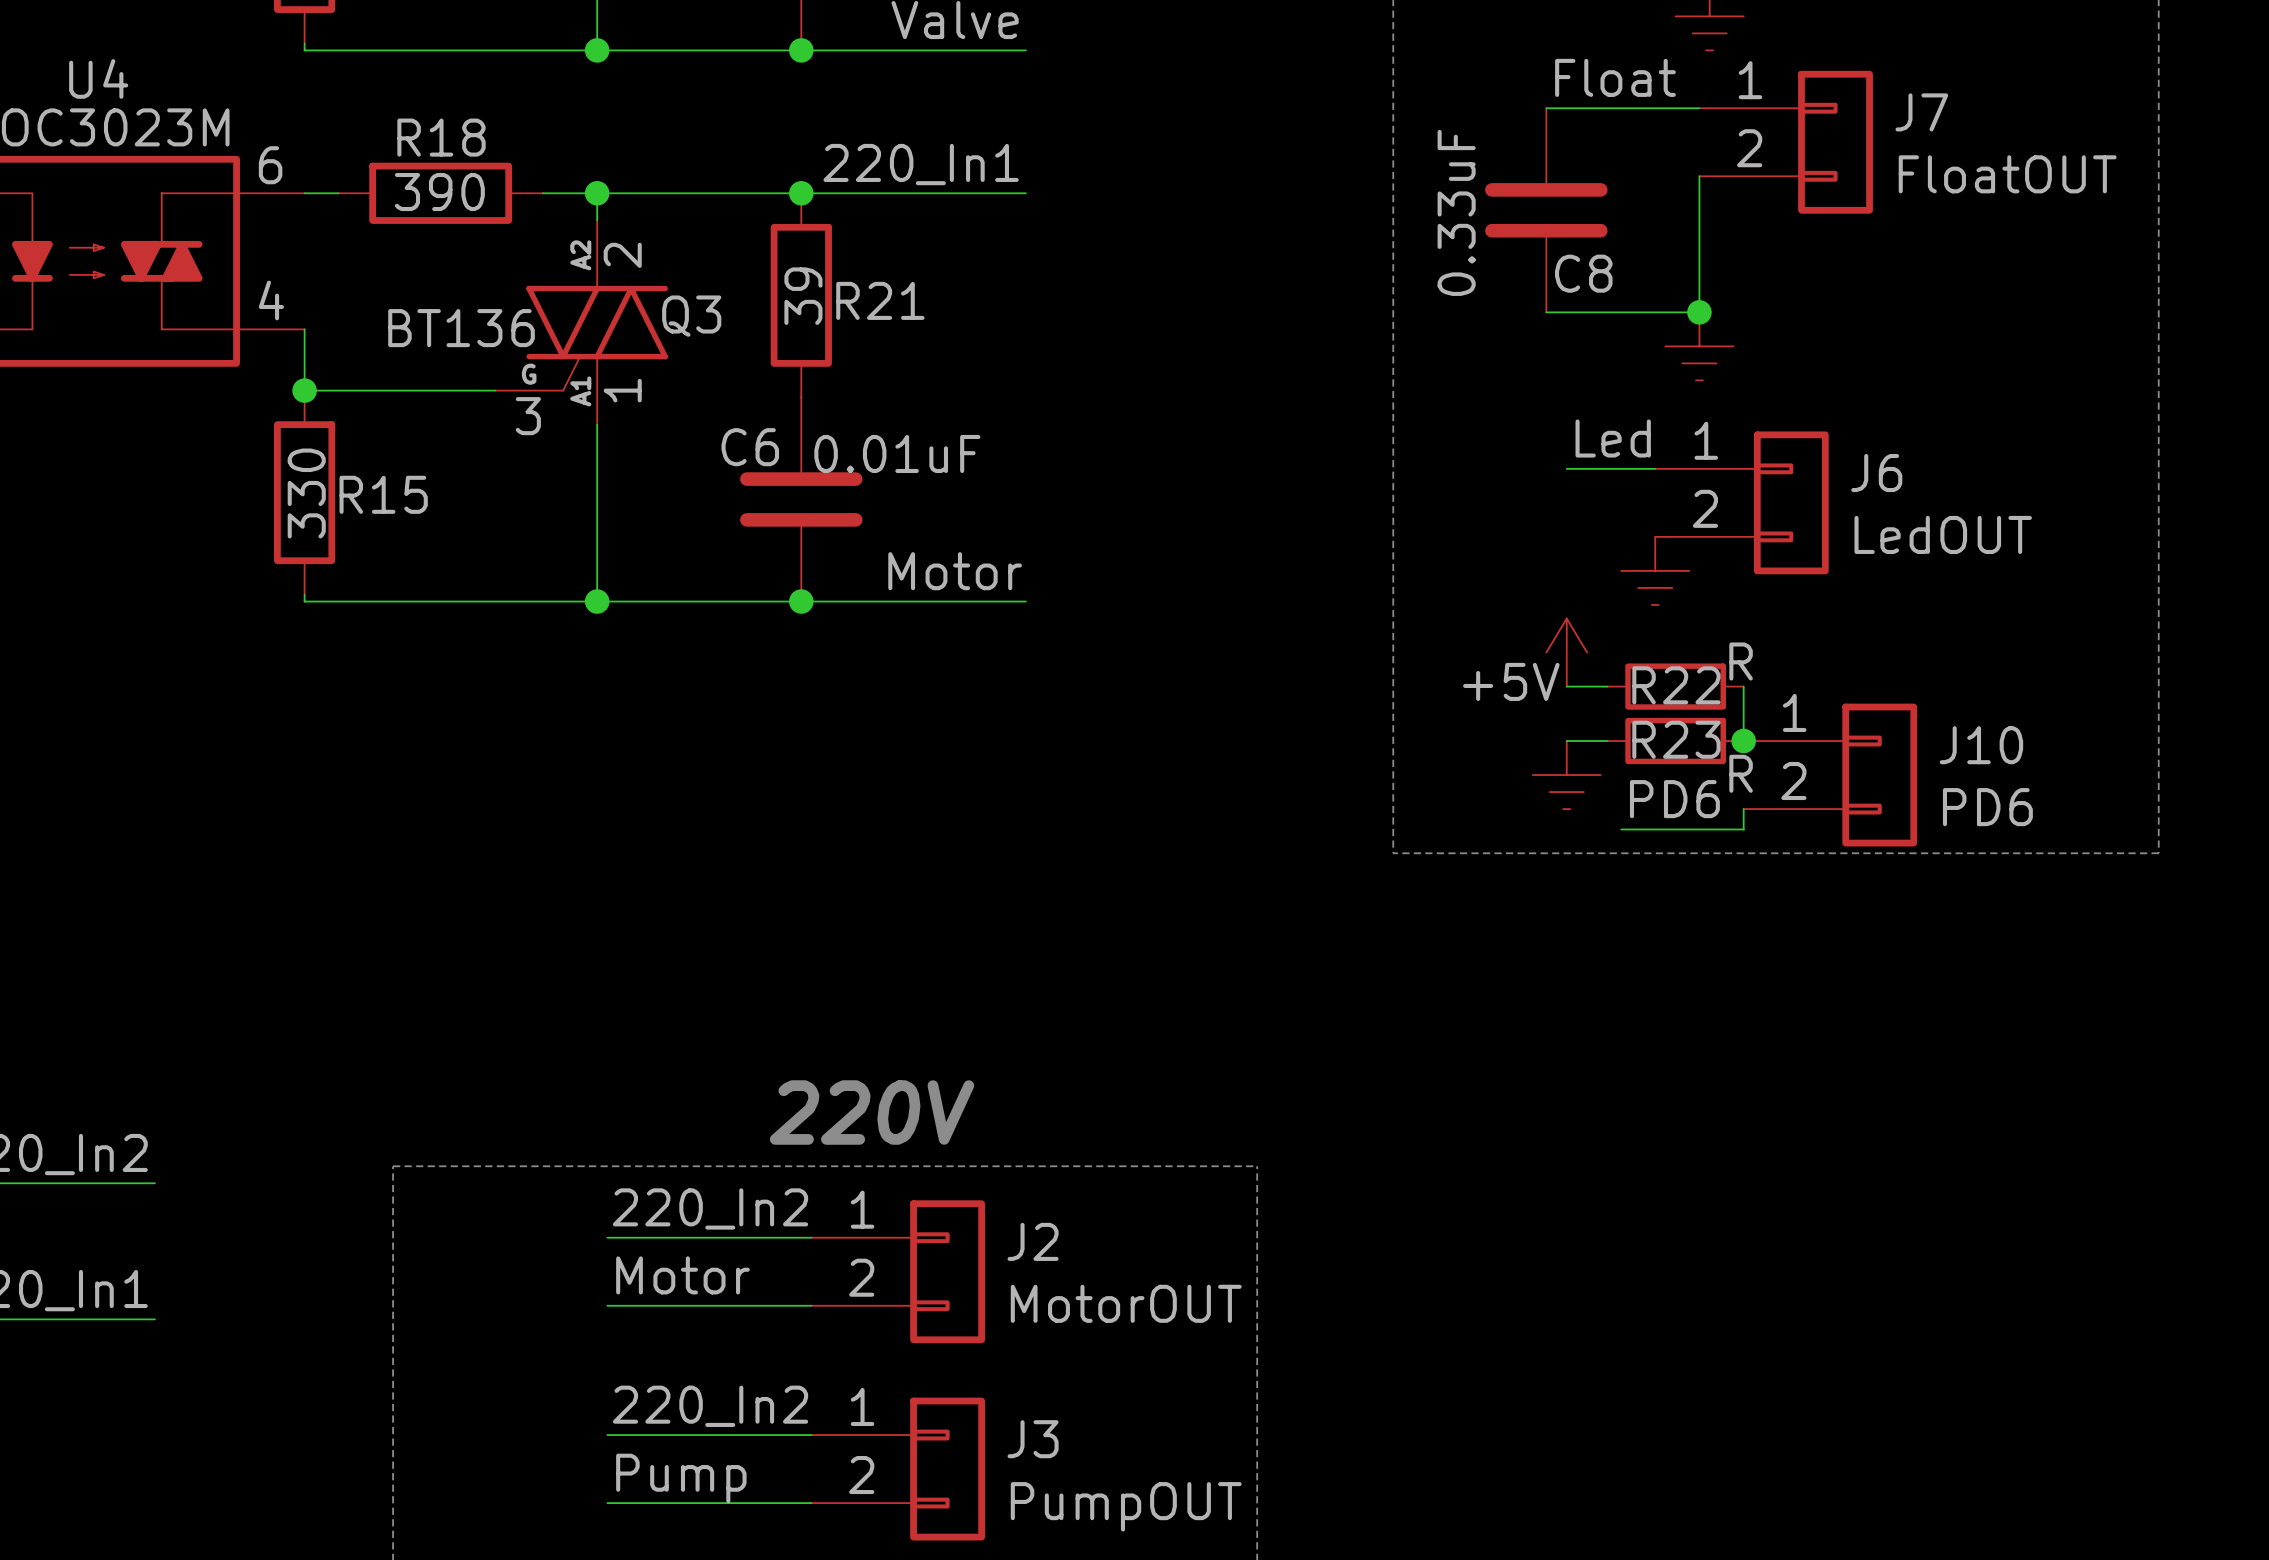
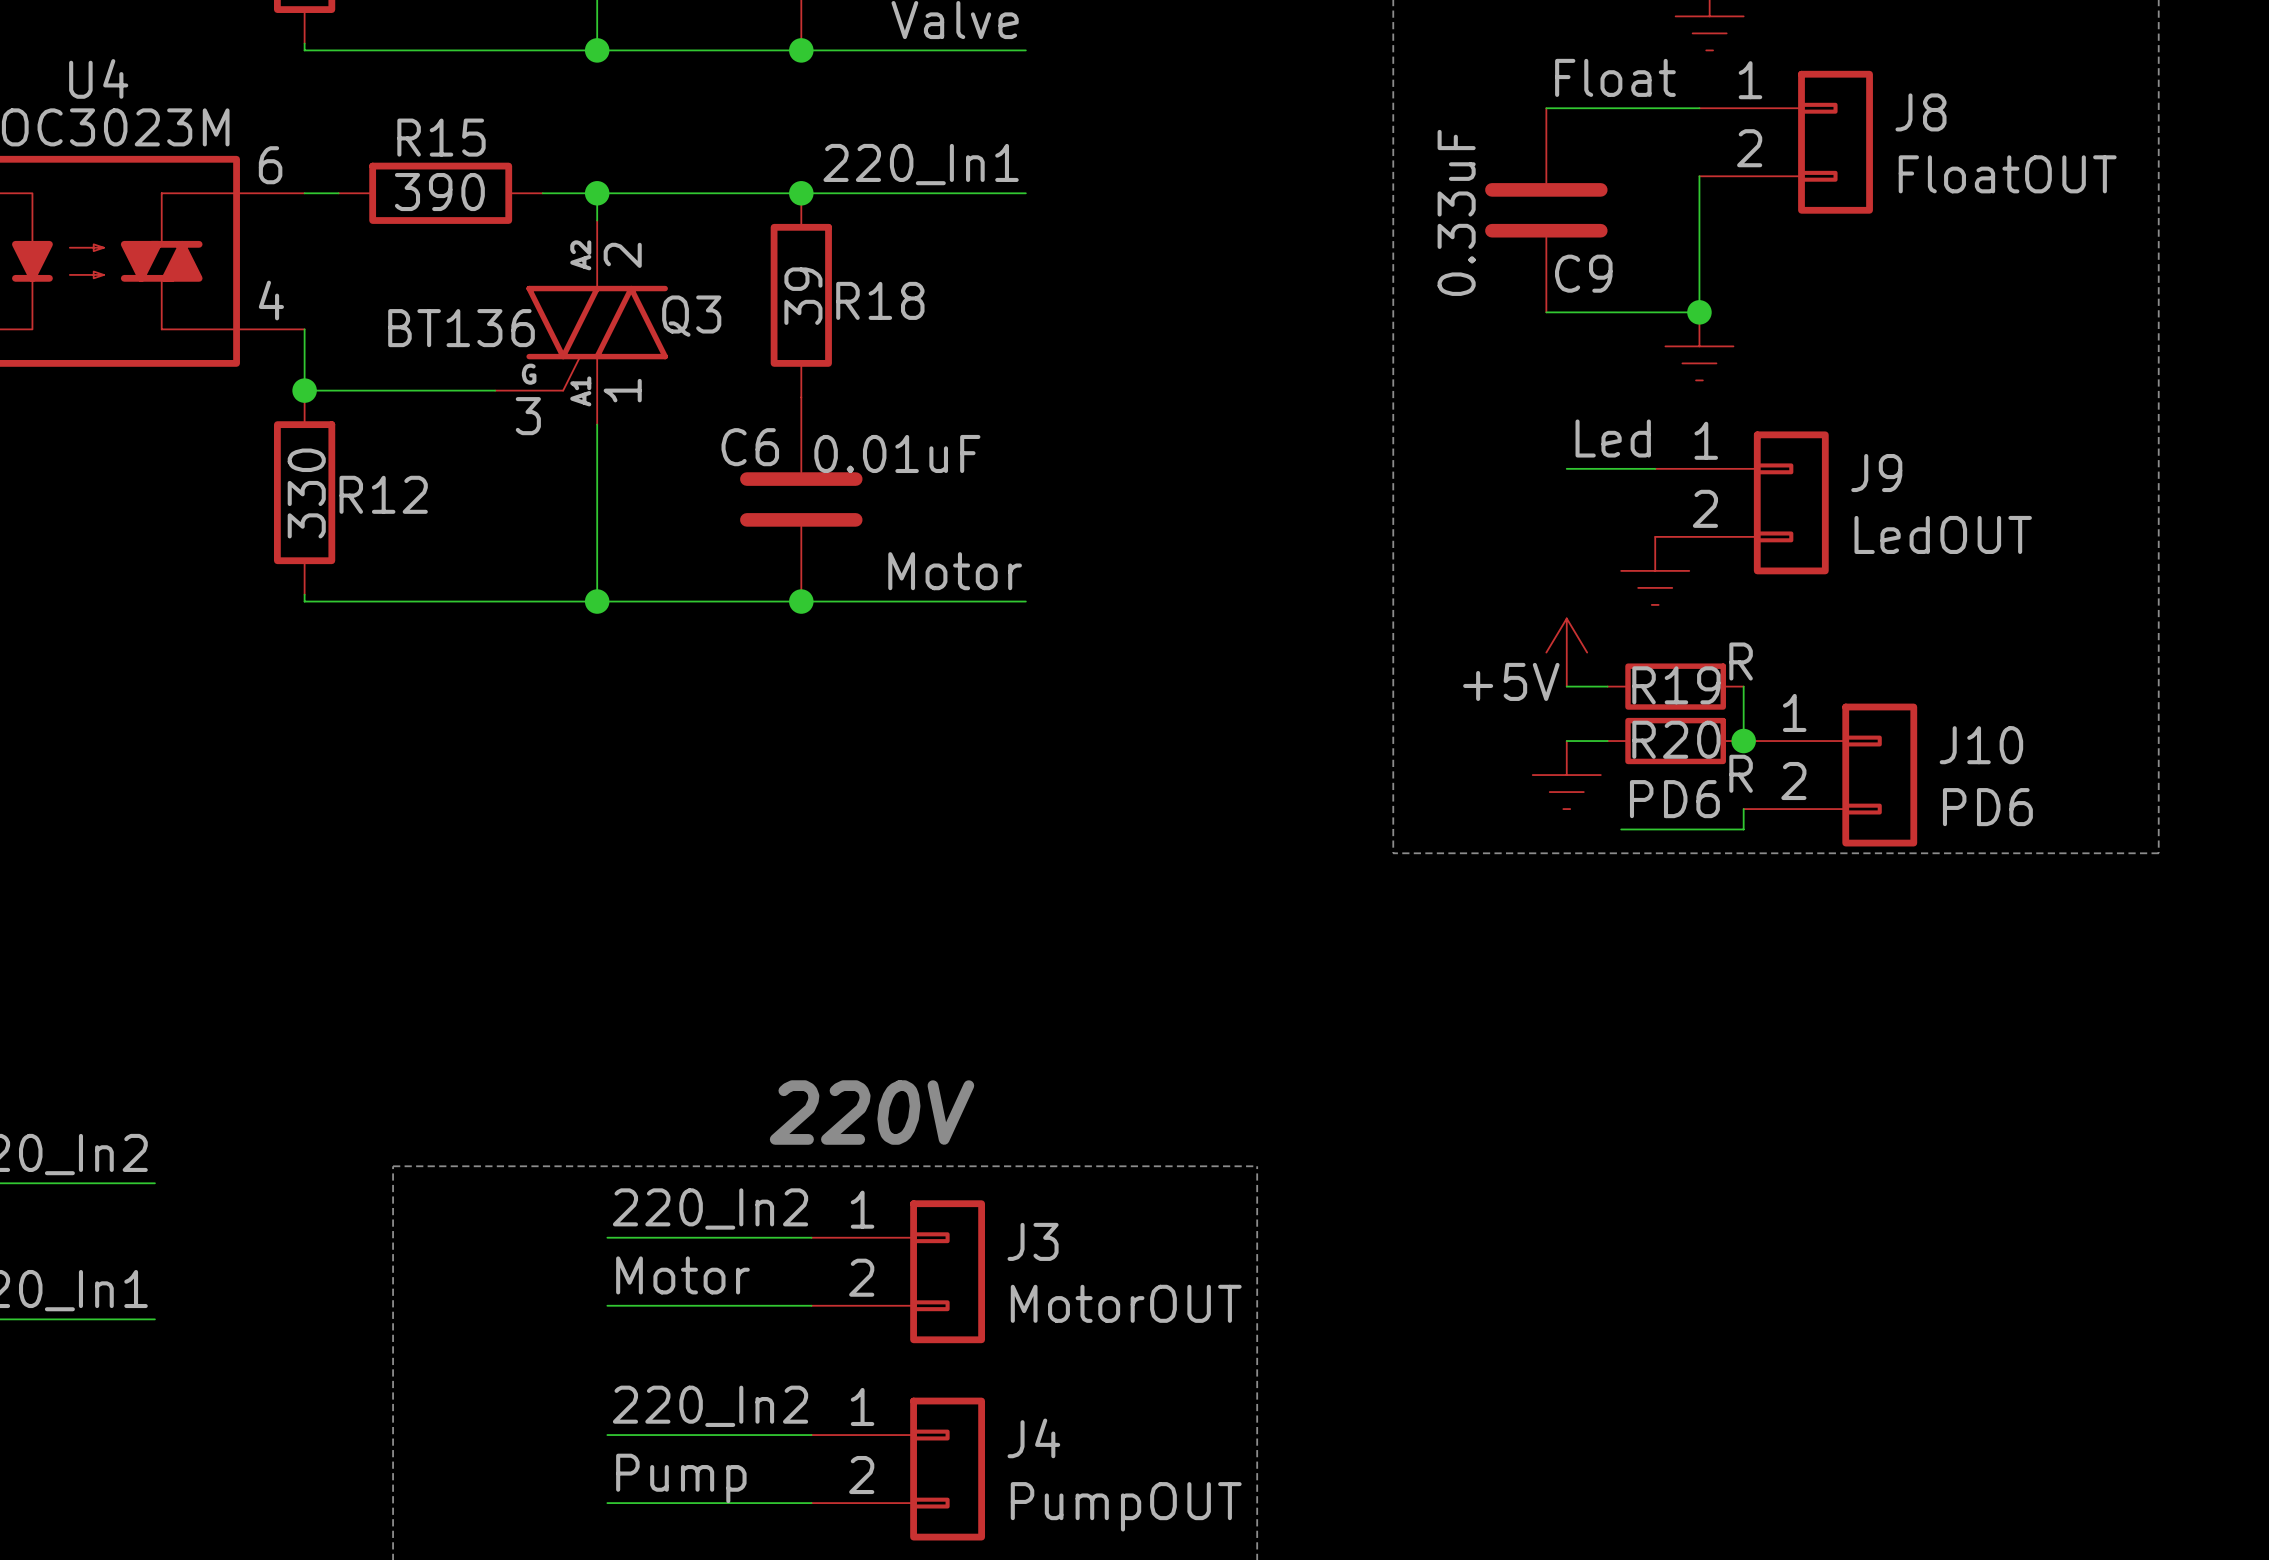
J7 name: J7 (1921, 112) -> J8 (1920, 112)
R18 name: R18 (441, 137) -> R15 (441, 137)
C8 name: C8 (1583, 273) -> C9 (1583, 273)
R21 name: R21 (880, 300) -> R18 (880, 300)
J6 name: J6 (1876, 473) -> J9 (1876, 473)
R15 name: R15 (383, 494) -> R12 (383, 494)
R22 name: R22 (1676, 685) -> R19 (1676, 685)
R23 name: R23 (1676, 739) -> R20 (1676, 739)
J2 name: J2 (1033, 1241) -> J3 (1033, 1241)
J3 name: J3 (1033, 1439) -> J4 (1033, 1438)

